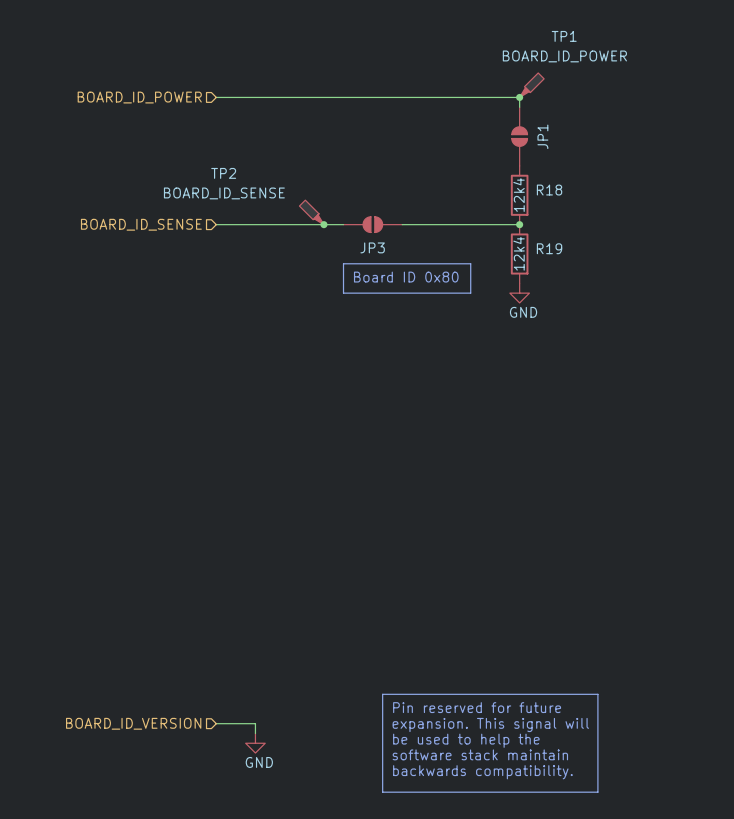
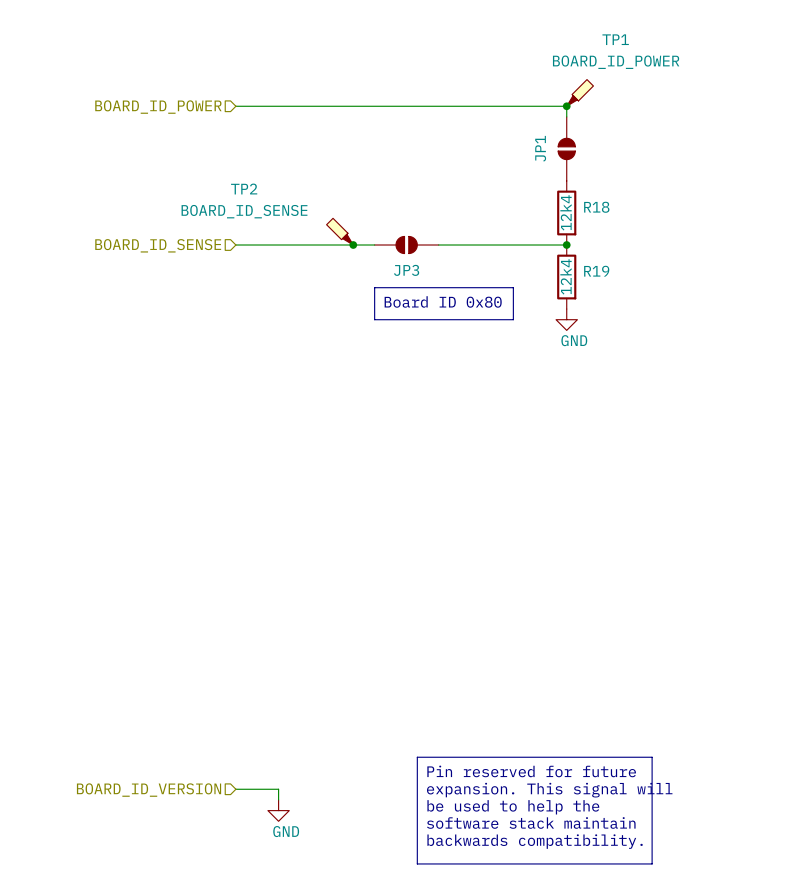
JP1 name position: JP1 (542, 136) -> JP1 (540, 148)

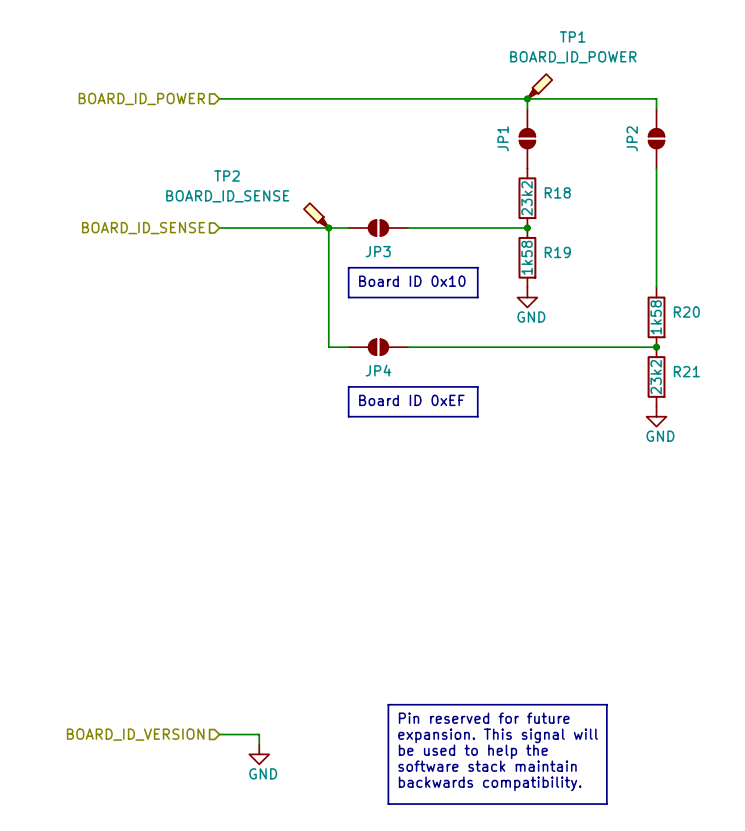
wire: none -> (527, 98) (656, 98) (656, 108)
JP2: none -> (656, 138)
wire: none -> (656, 168) (656, 287)
R18 value: 12k4 (566, 212) -> 23k2 (527, 198)
wire: none -> (328, 228) (328, 347) (348, 347)
R19 value: 12k4 (566, 276) -> 1k58 (527, 257)
text: Board ID 0x80 (443, 301) -> Board ID 0x10 (412, 281)
R20: none -> 1k58 (656, 317)
JP4: none -> (378, 347)
wire: none -> (408, 347) (656, 347)
junction: none -> (656, 347)
R21: none -> 23k2 (656, 376)
line: none -> (348, 386) (477, 386) (477, 416) (348, 416) (348, 386)
text: none -> Board ID 0xEF (411, 400)
power symbol: none -> GND (656, 416)

